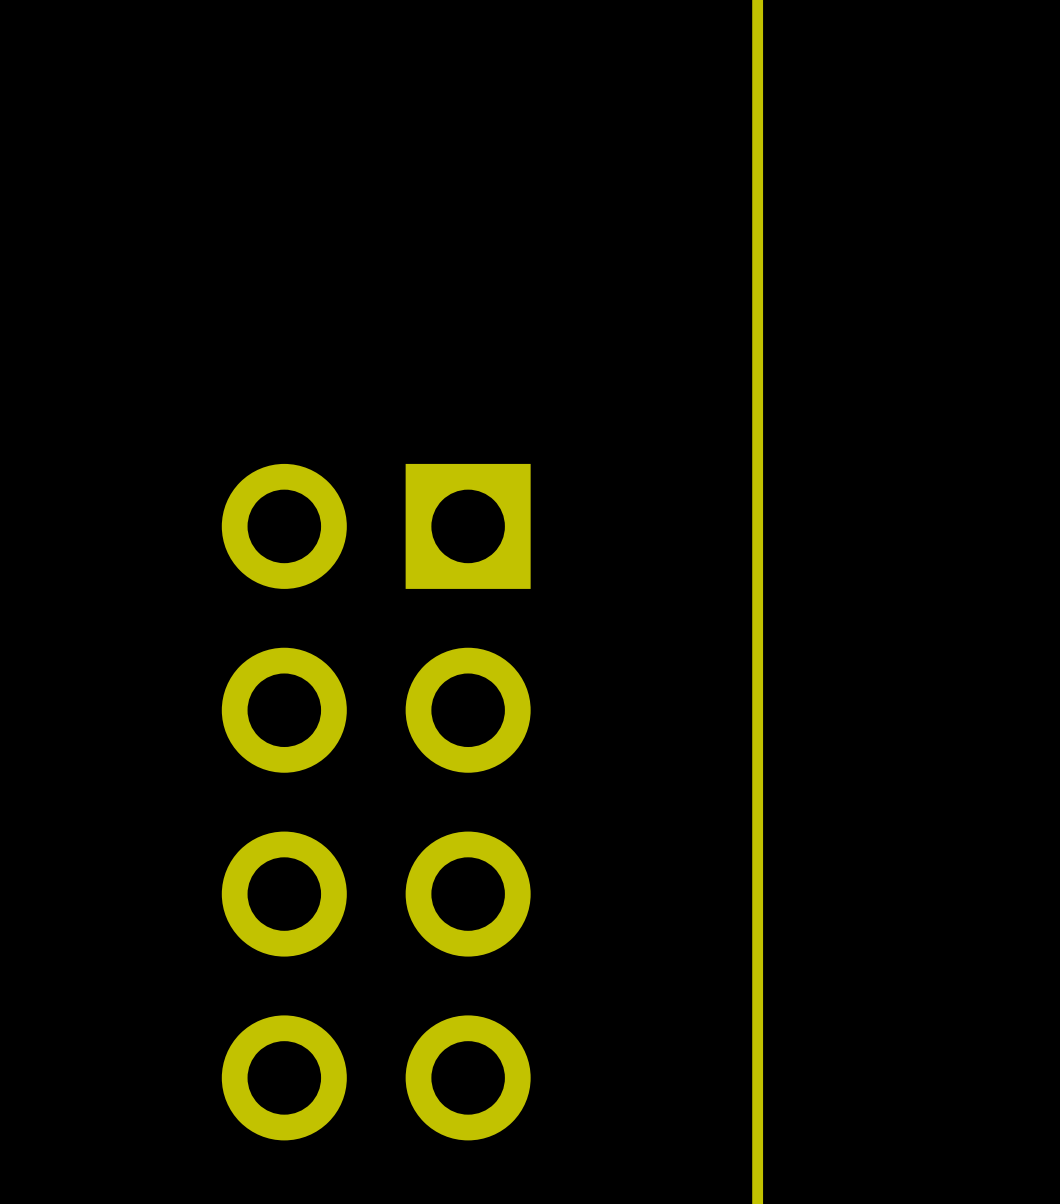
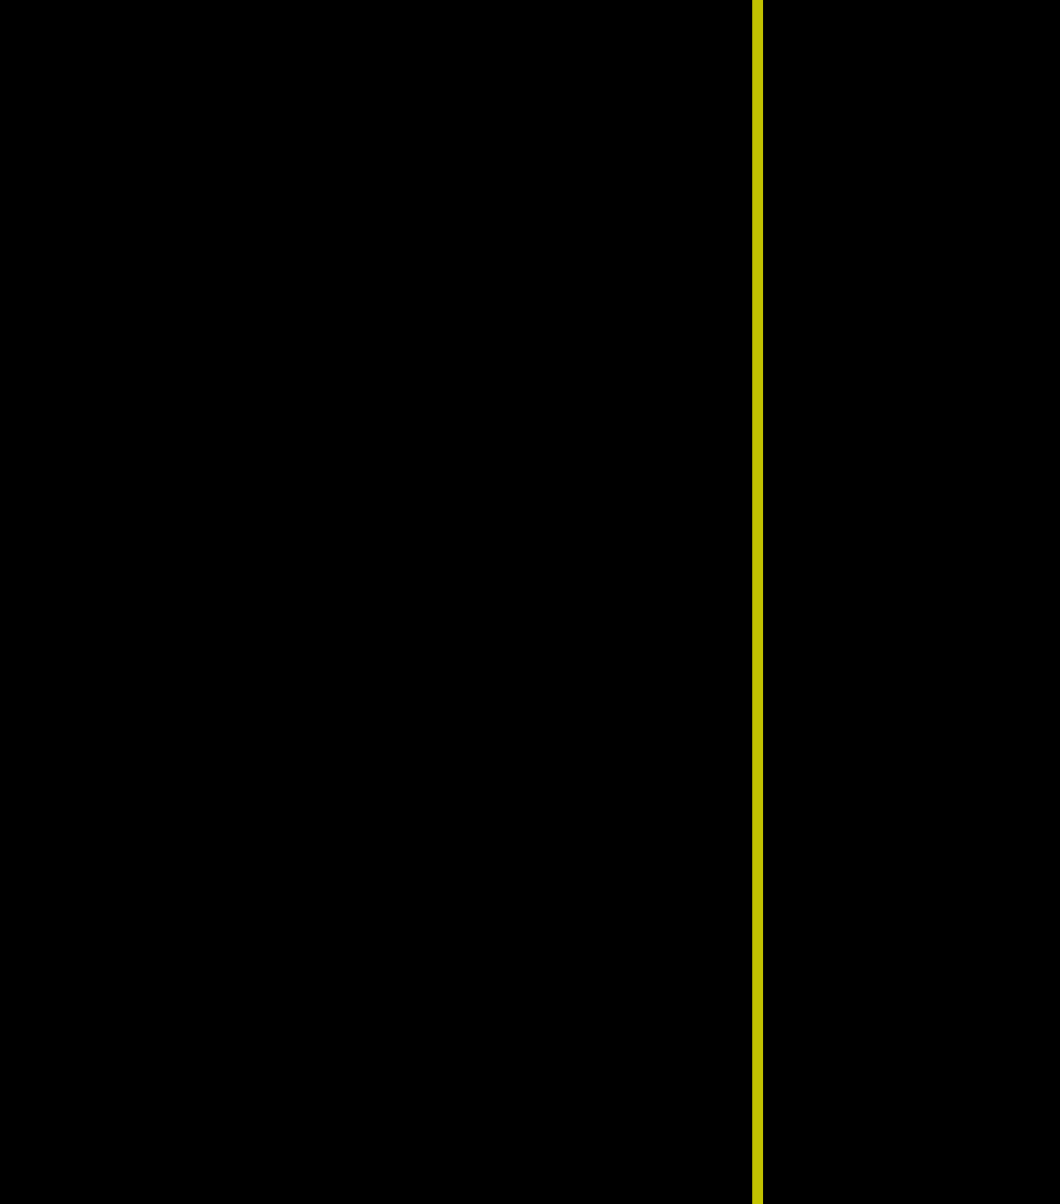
part: (376, 802) -> none

